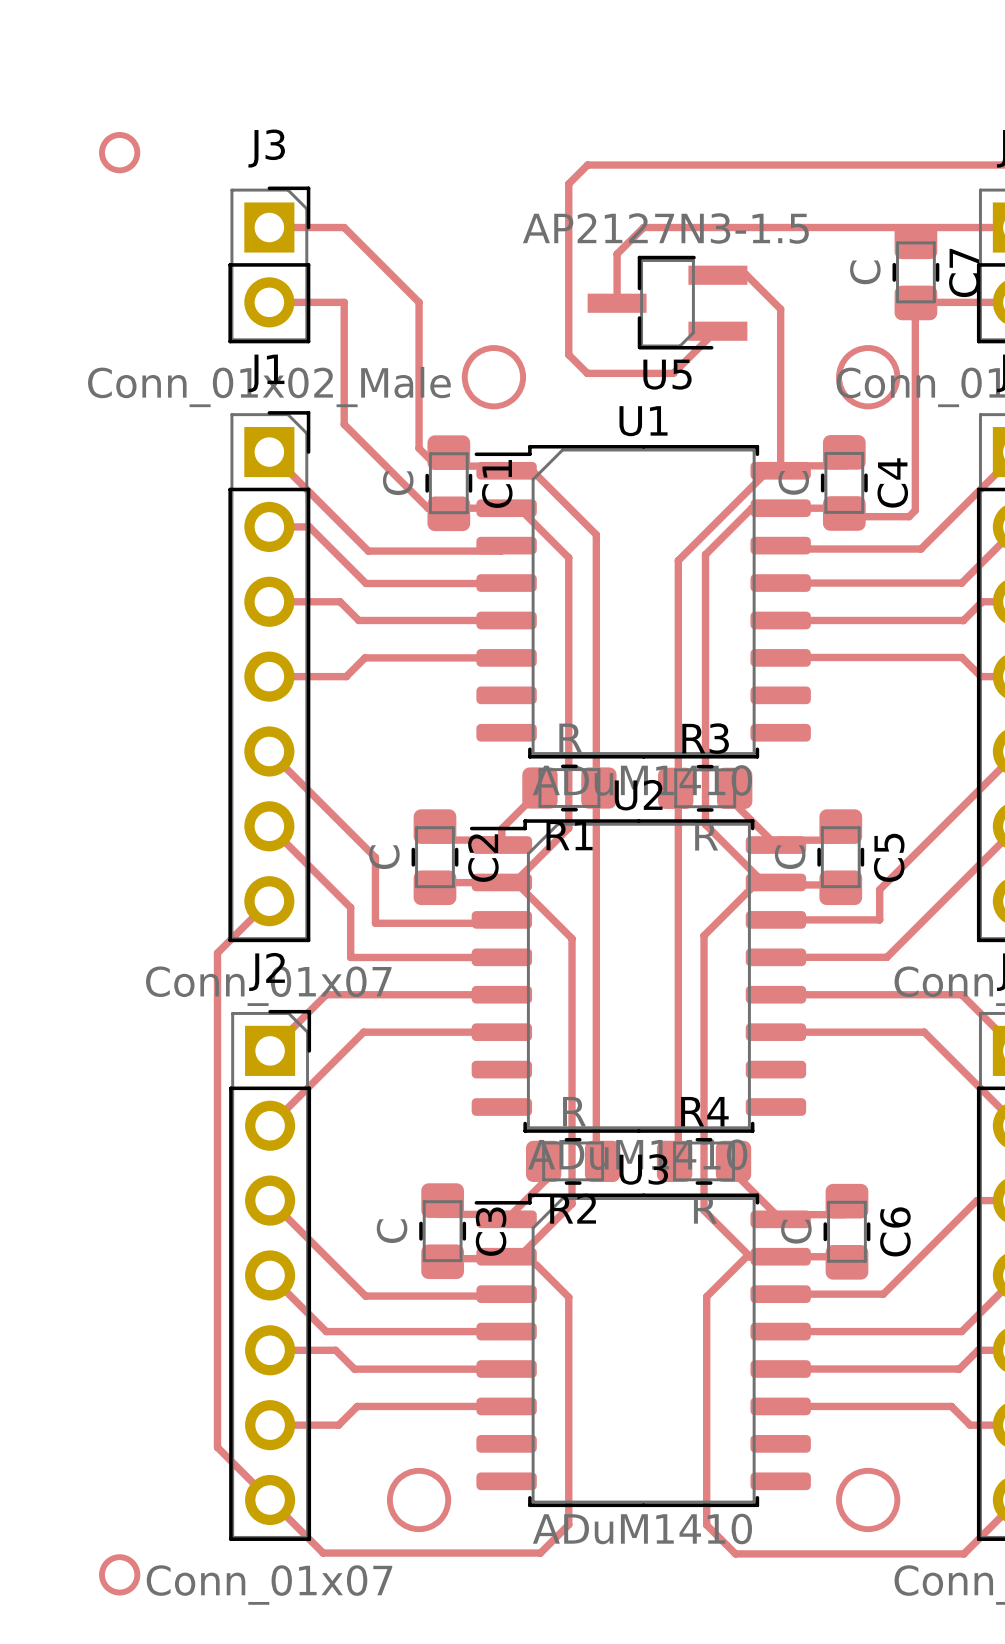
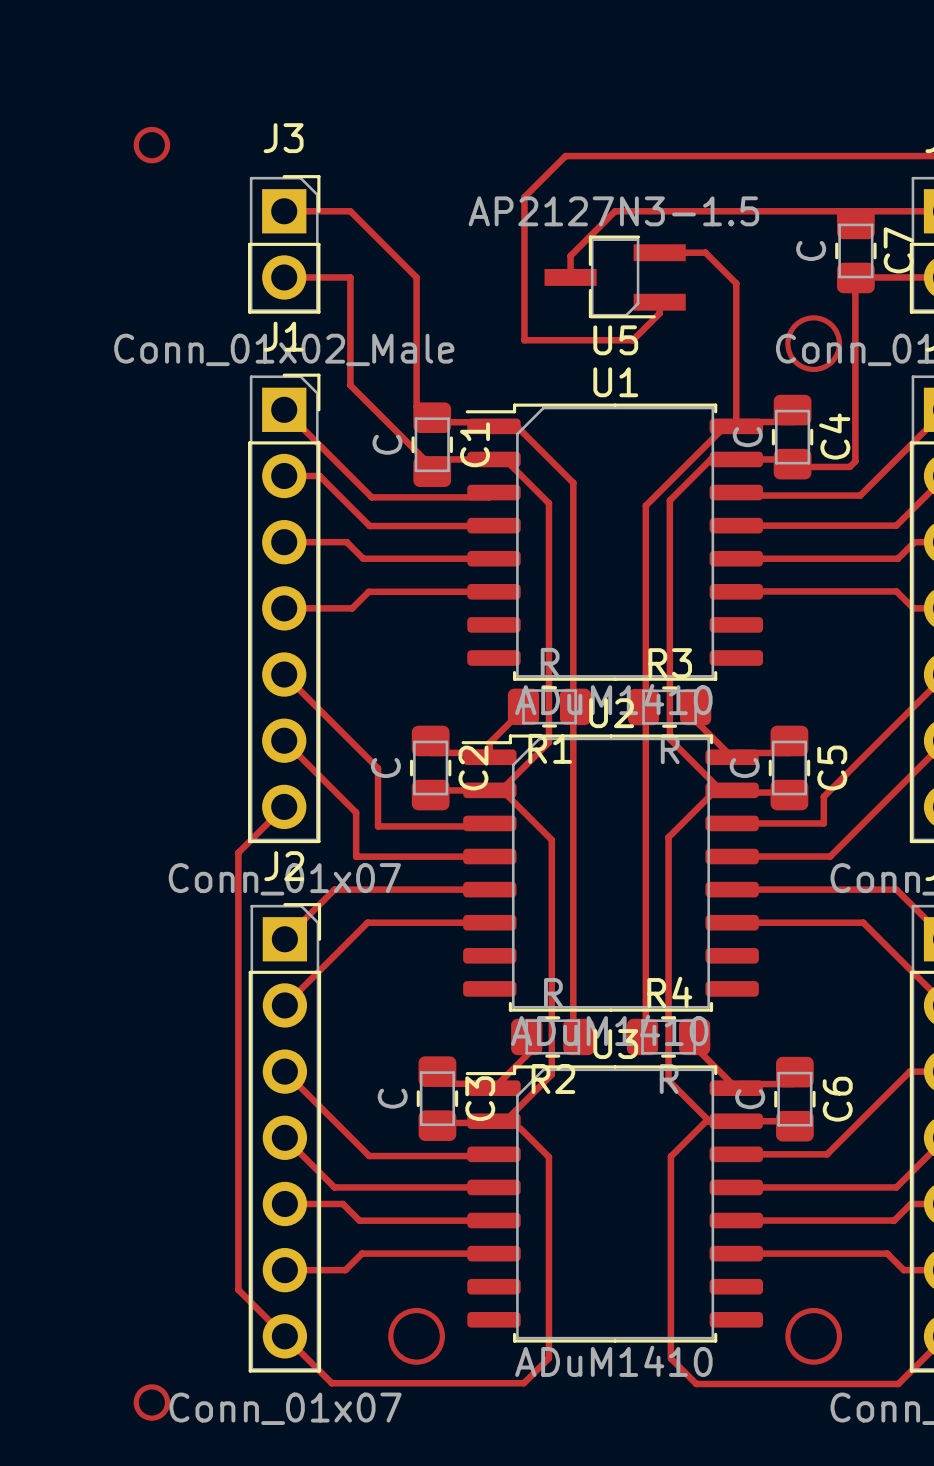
top track: (568, 183) (568, 354) (587, 373) -> (548, 172) (524, 197) (524, 340) (565, 340)
top track: (617, 254) (617, 302) (593, 302) -> (591, 234) (570, 255) (570, 277)
U5 position: (667, 302) -> (615, 276)
top track: (717, 331) (715, 331) (673, 373) (663, 373) -> (659, 302) (659, 313) (632, 340)
drawing: [461, 345, 527, 410] -> none
C1 position: (448, 483) -> (432, 444)

